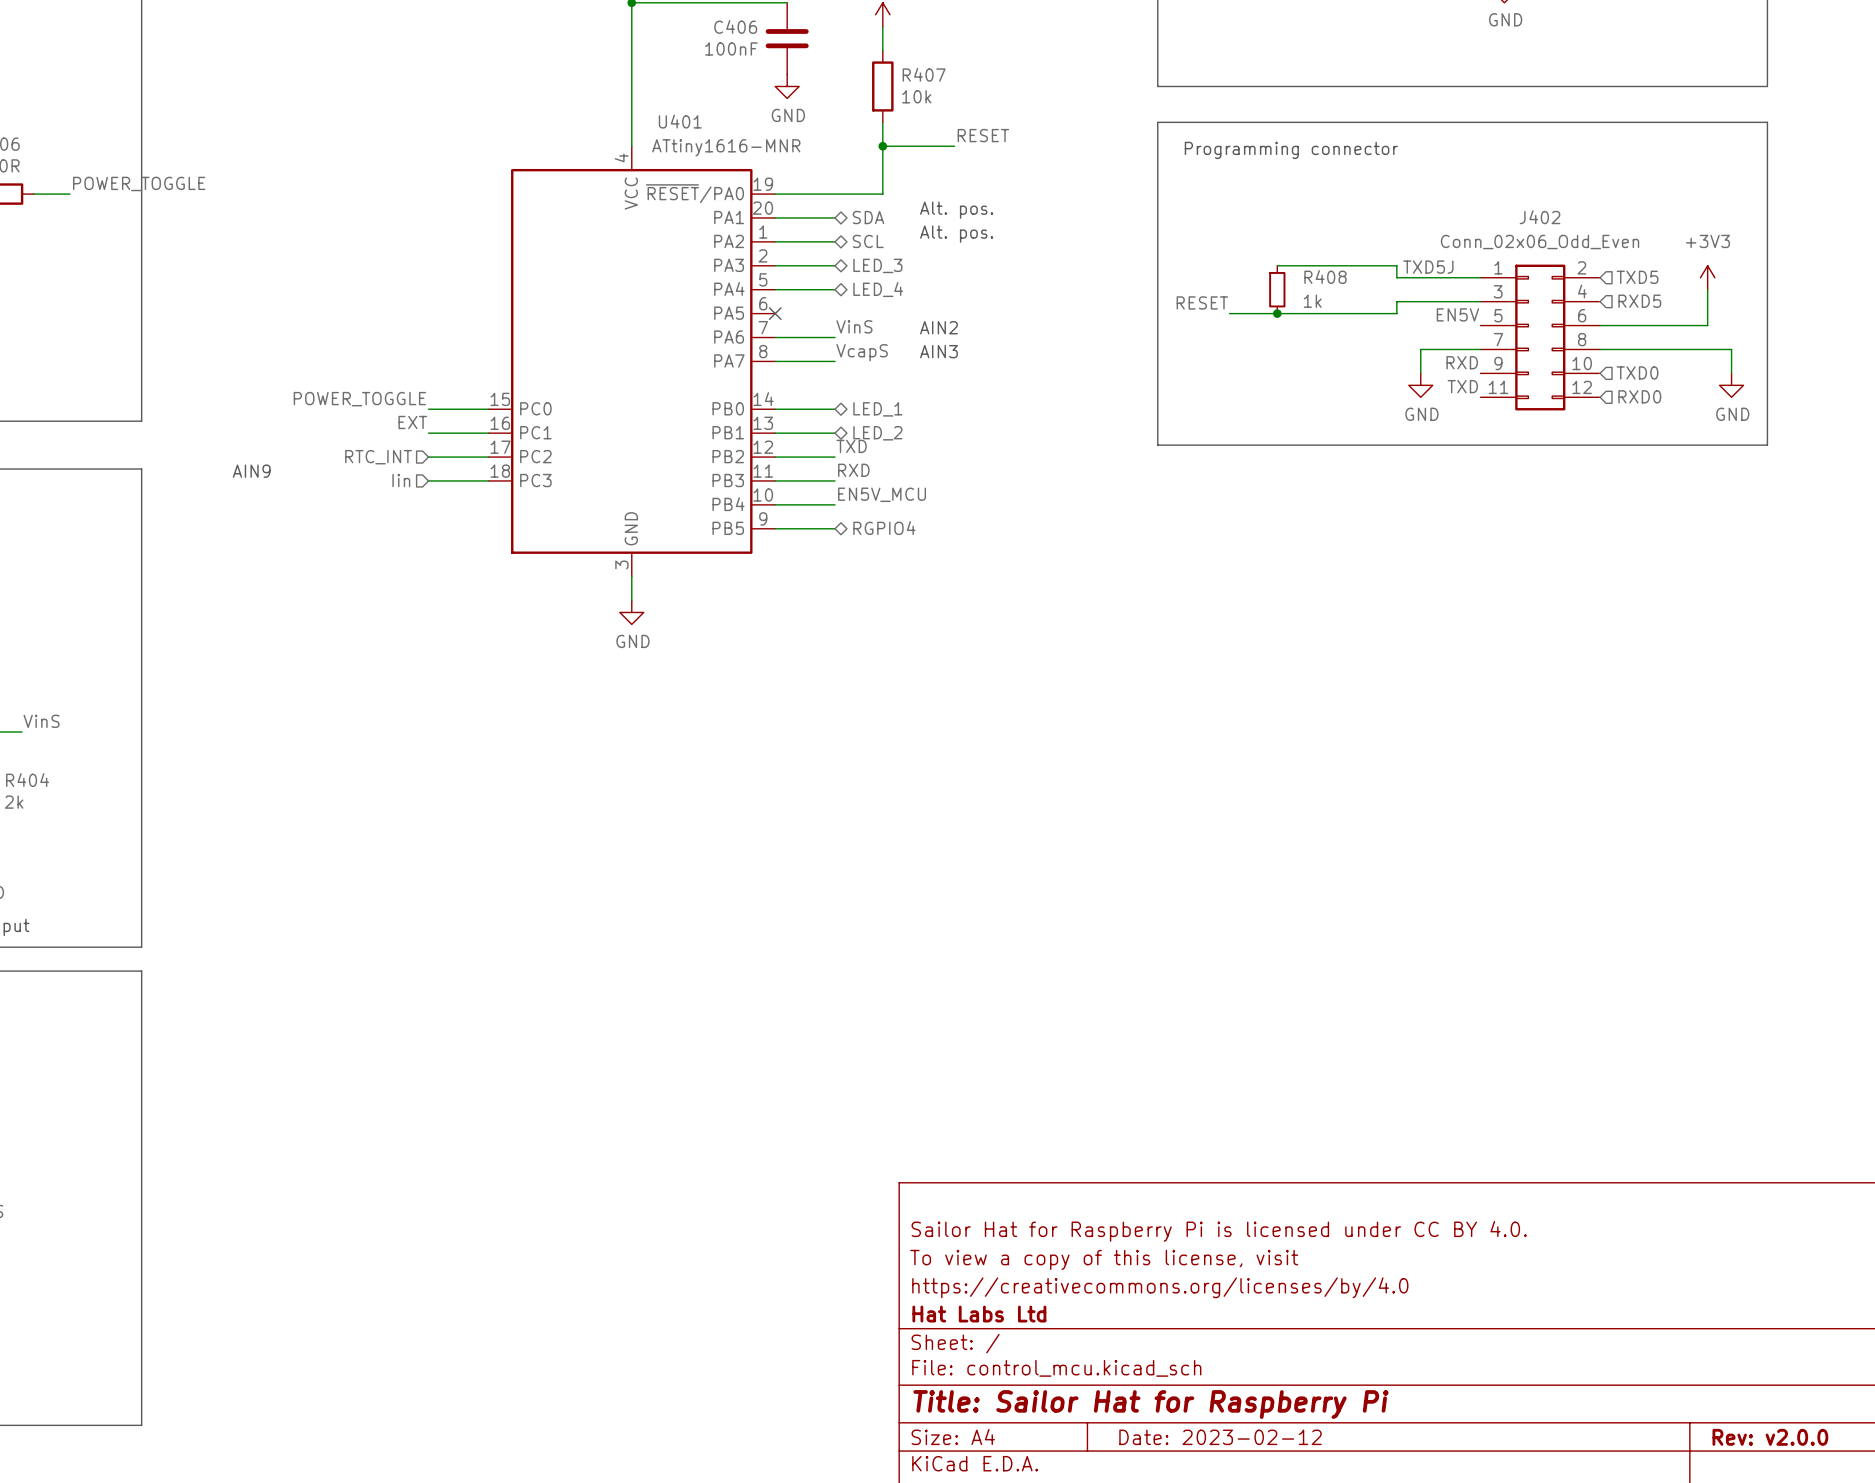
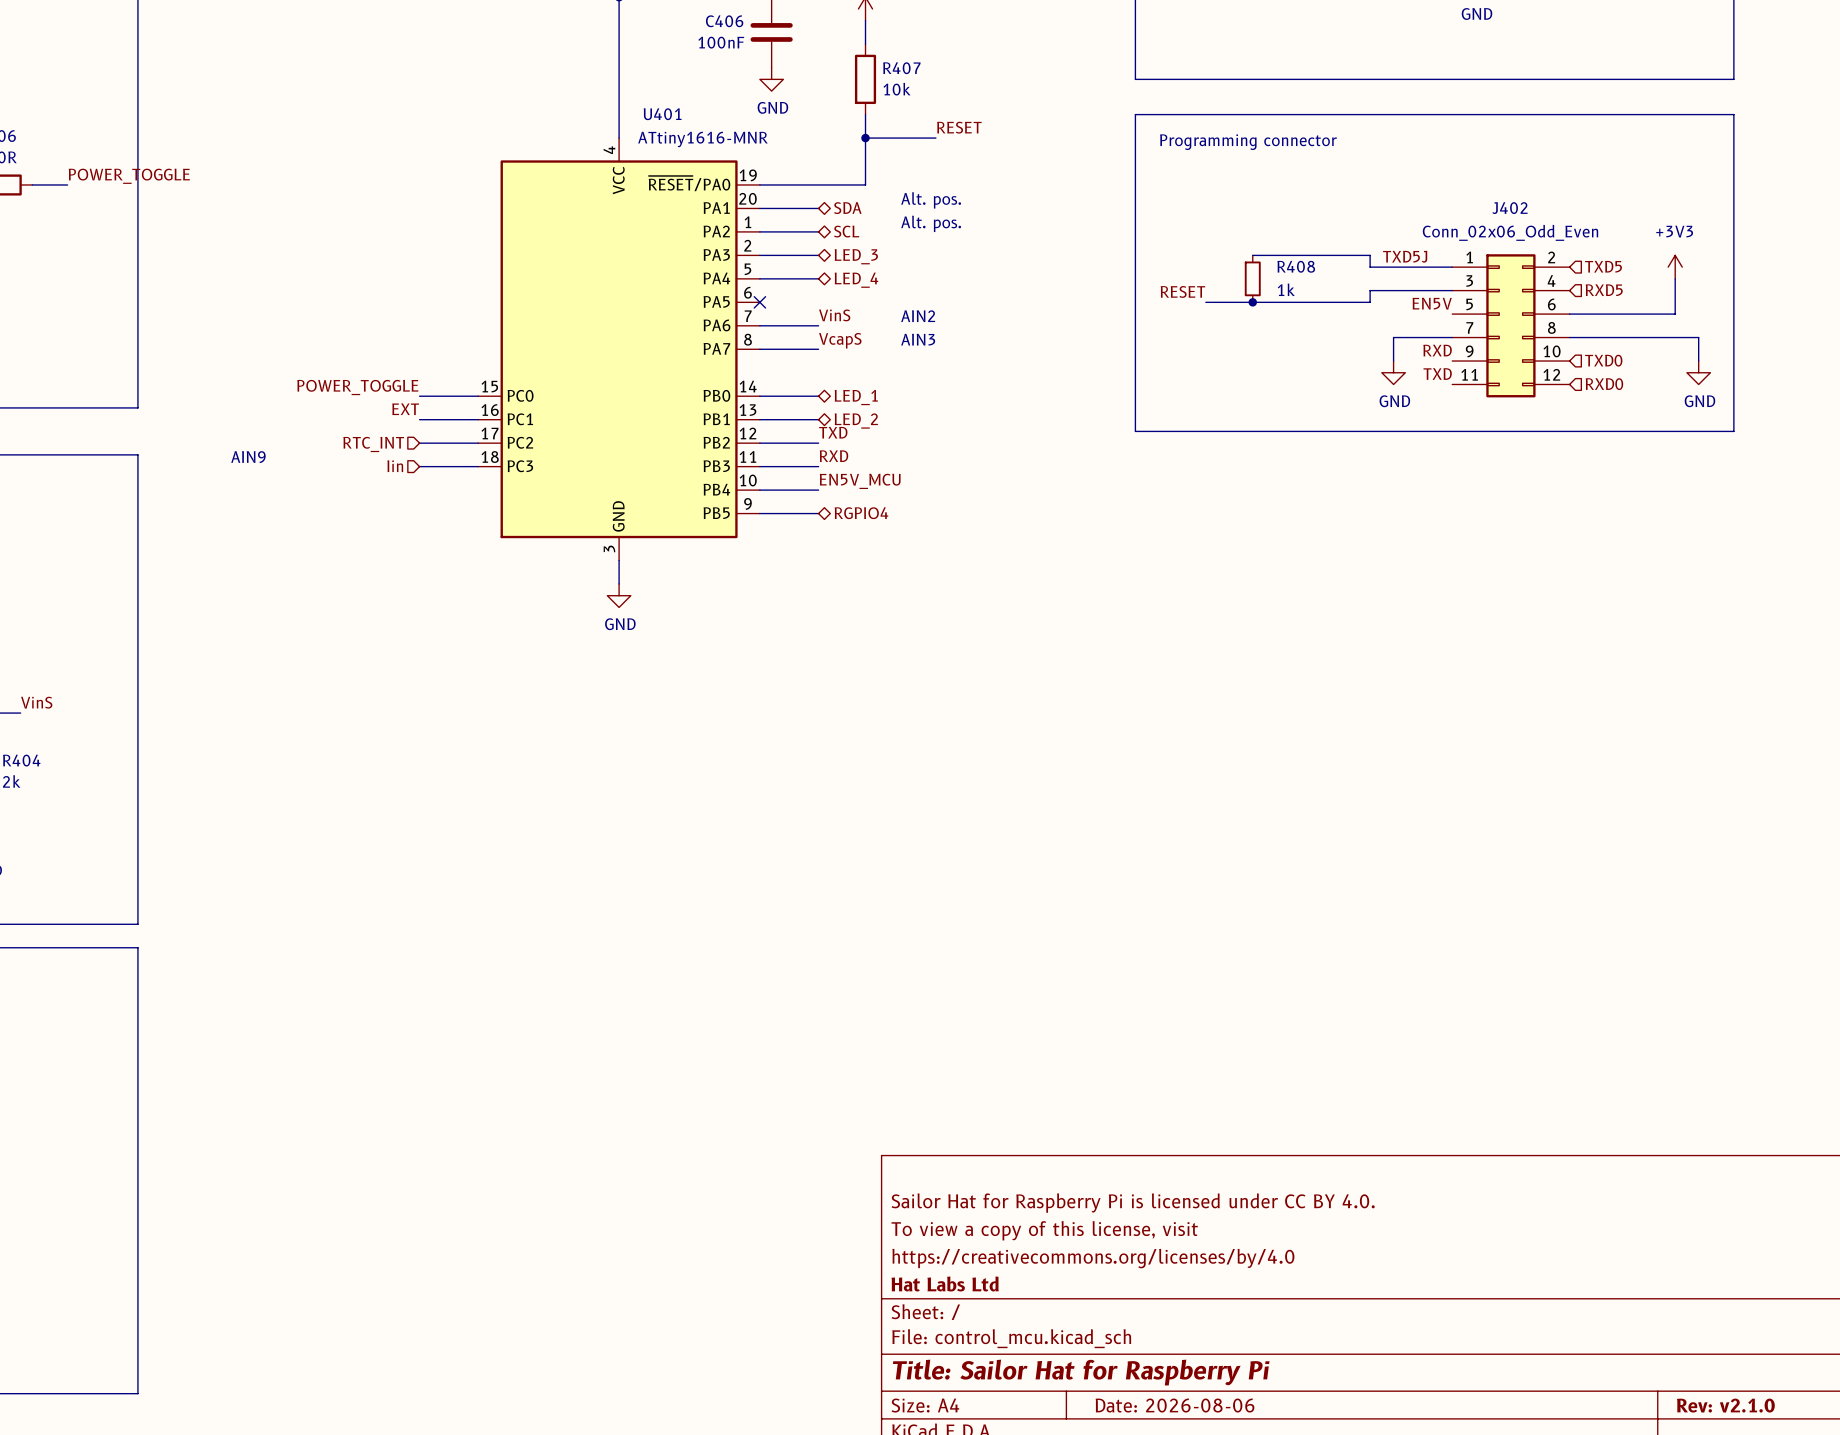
title block: Date: 2023-02-12 (1220, 1437) -> Date: 2026-08-06 (1175, 1405)
title block: Rev: v2.0.0 (1770, 1437) -> Rev: v2.1.0 (1725, 1405)

